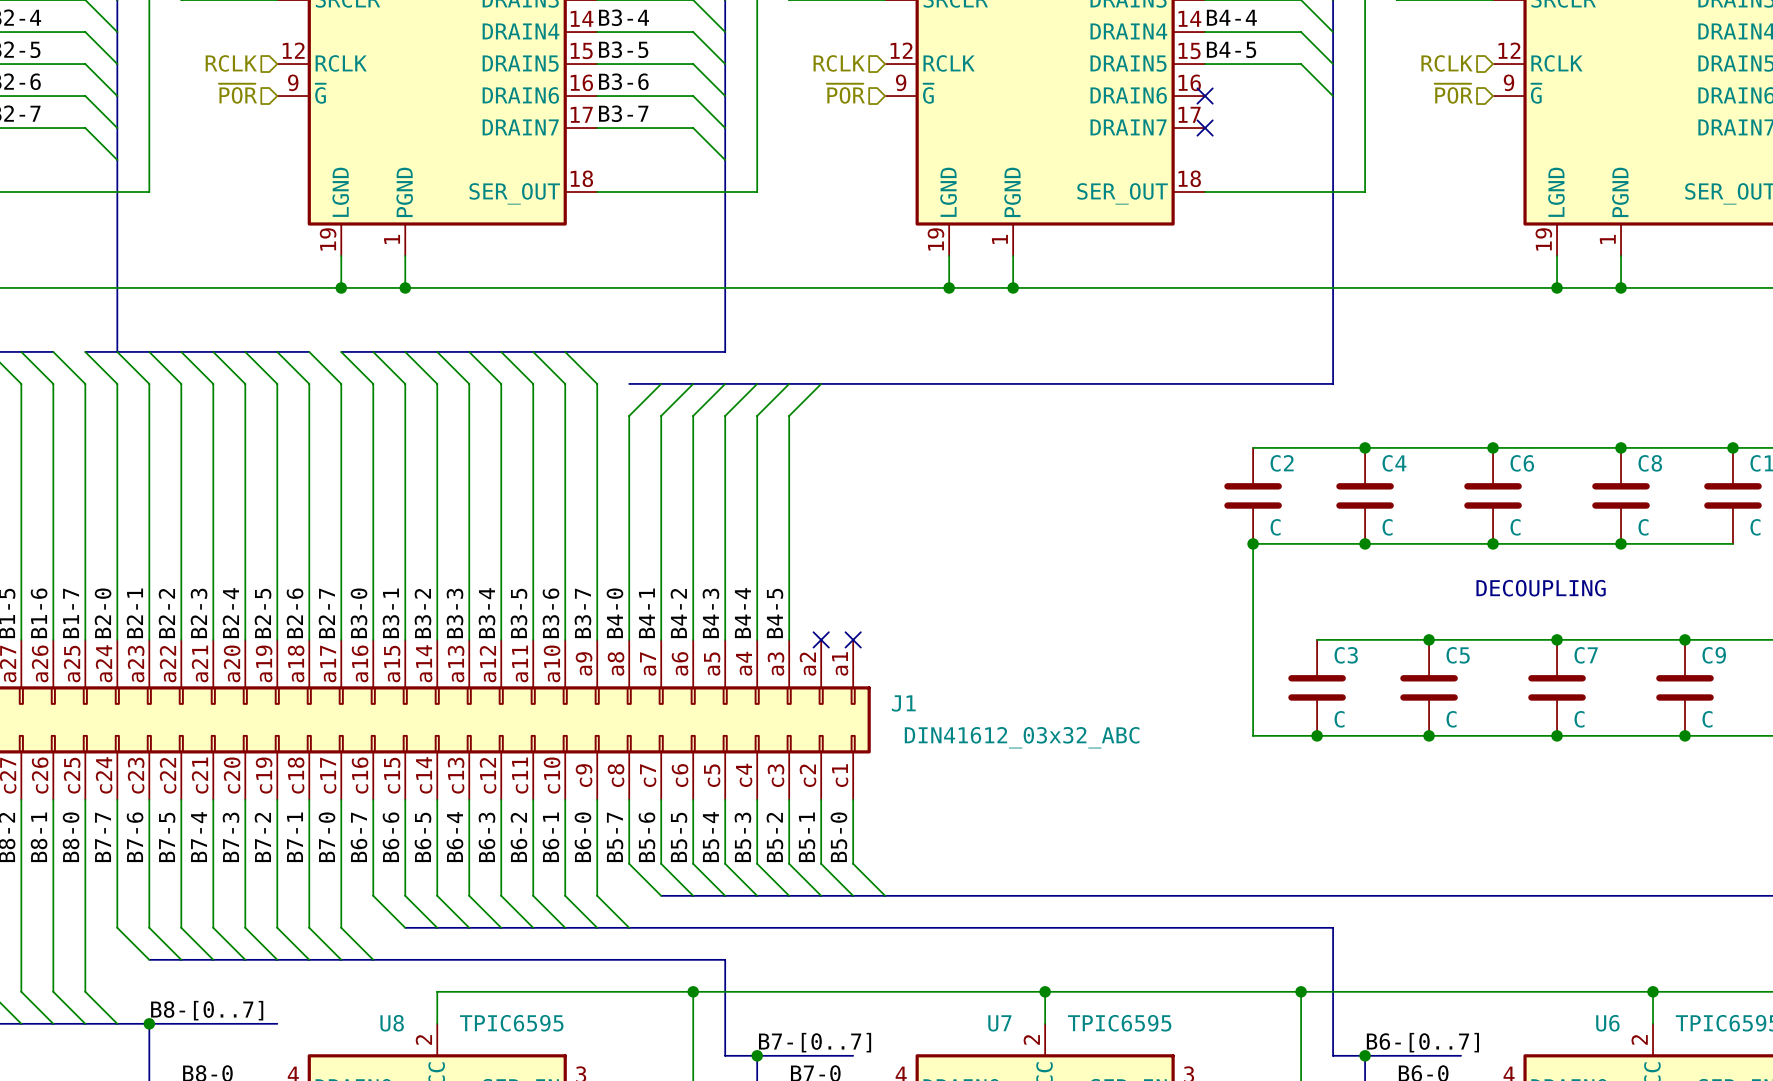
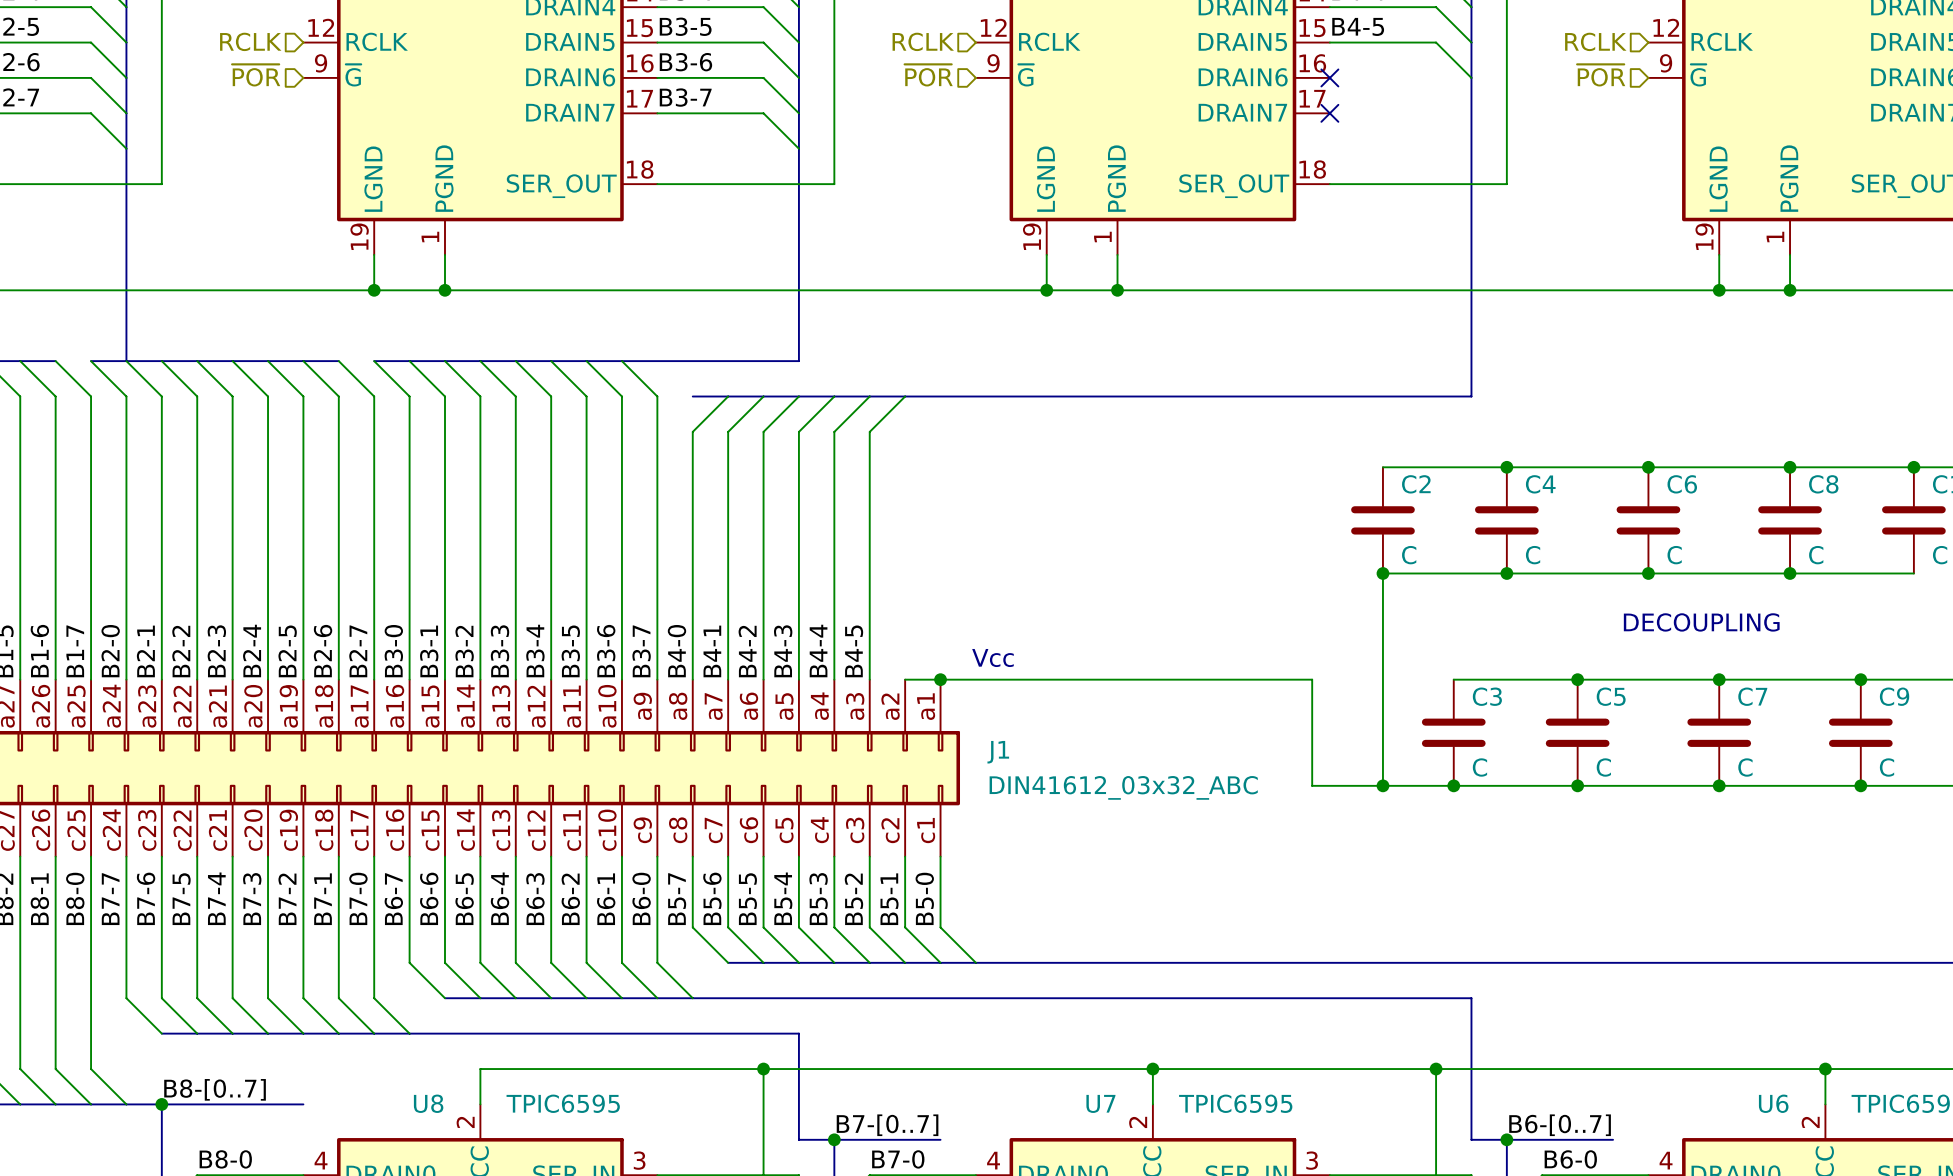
text: none -> Vcc (992, 658)
wire: none -> (905, 679) (1312, 679) (1312, 785) (1382, 785)
no-connect mark: (821, 639) -> none
no-connect mark: (853, 639) -> none
junction: none -> (940, 679)
junction: none -> (1382, 785)

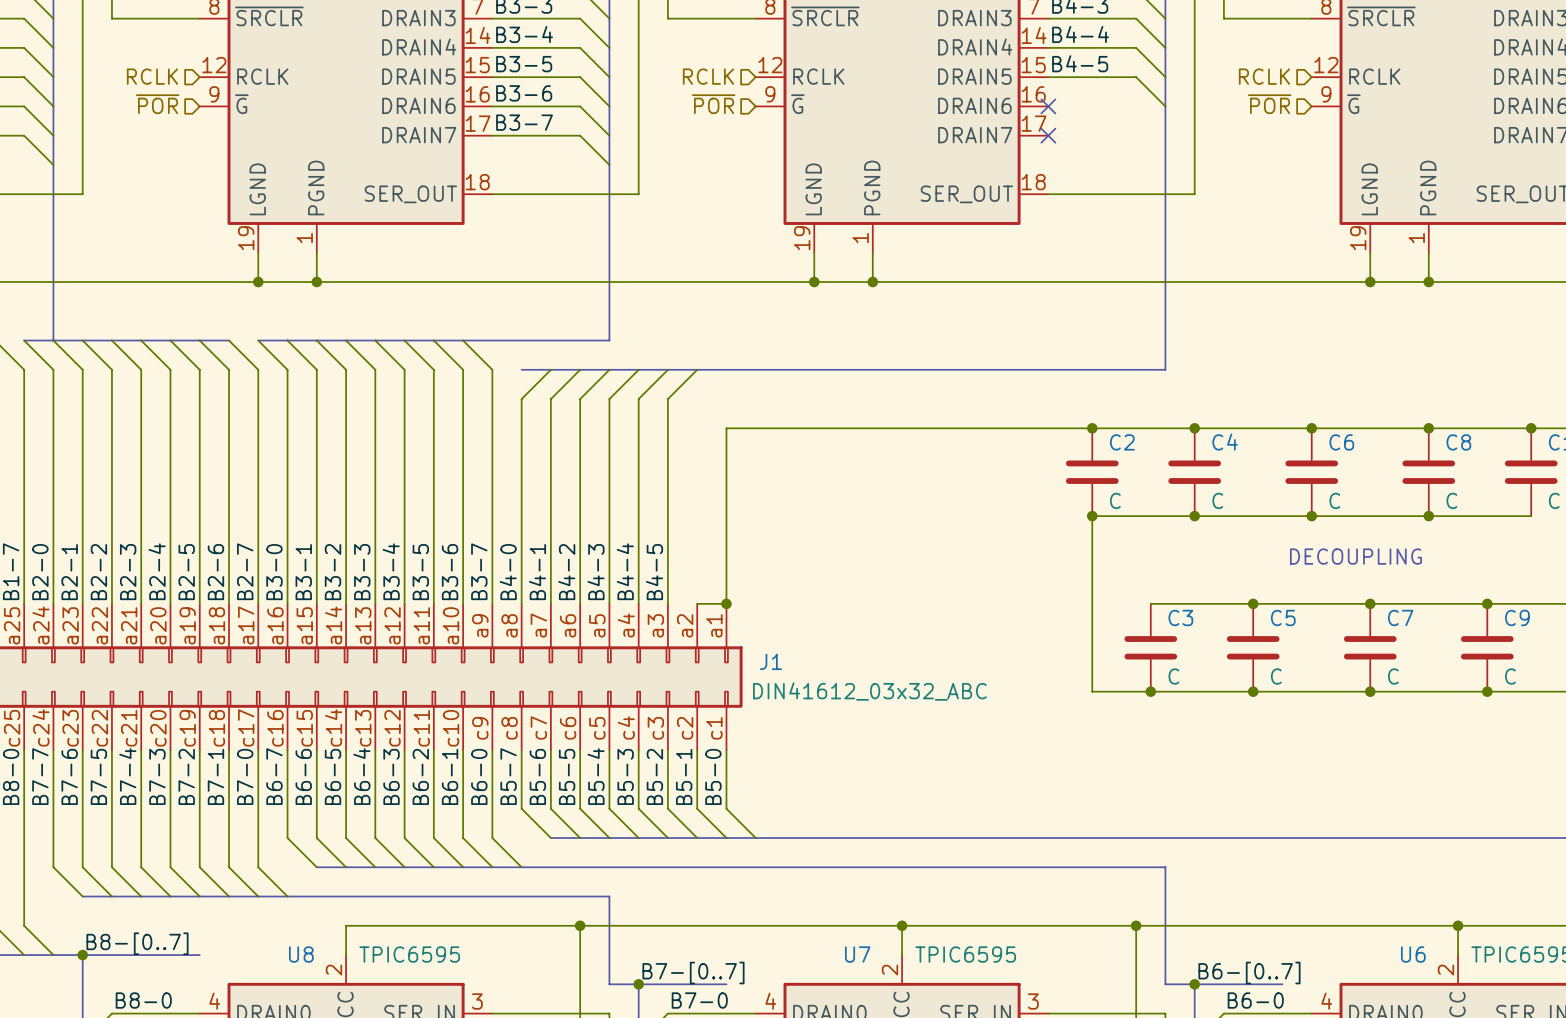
junction: none -> (1092, 428)
text: Vcc (992, 658) -> none
wire: (940, 679) (1312, 679) (1312, 785) (1382, 785) -> (726, 603) (726, 428) (1092, 428)
junction: (1382, 785) -> none

